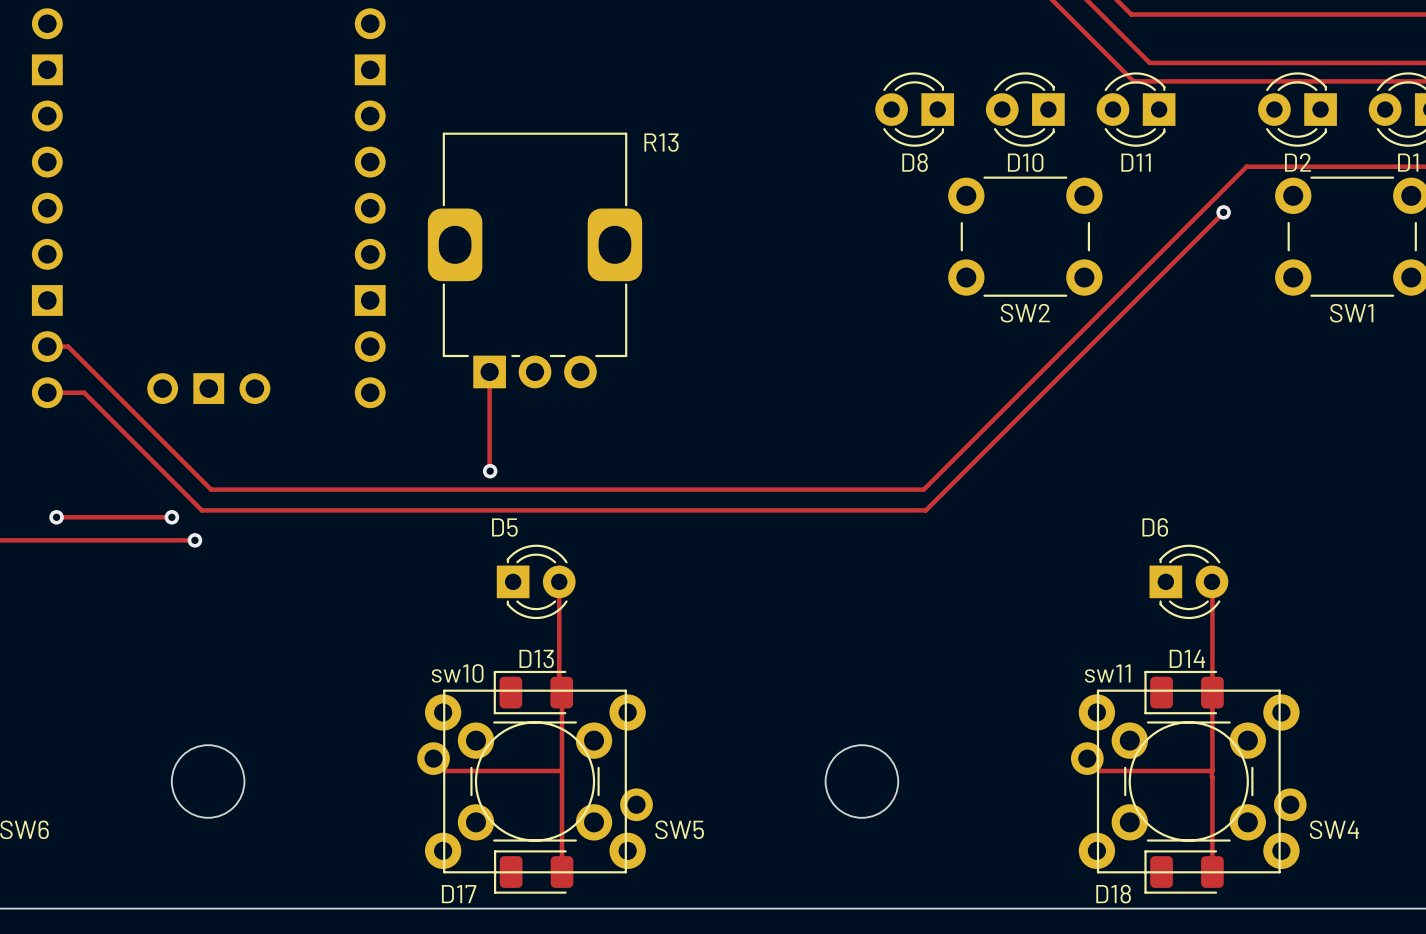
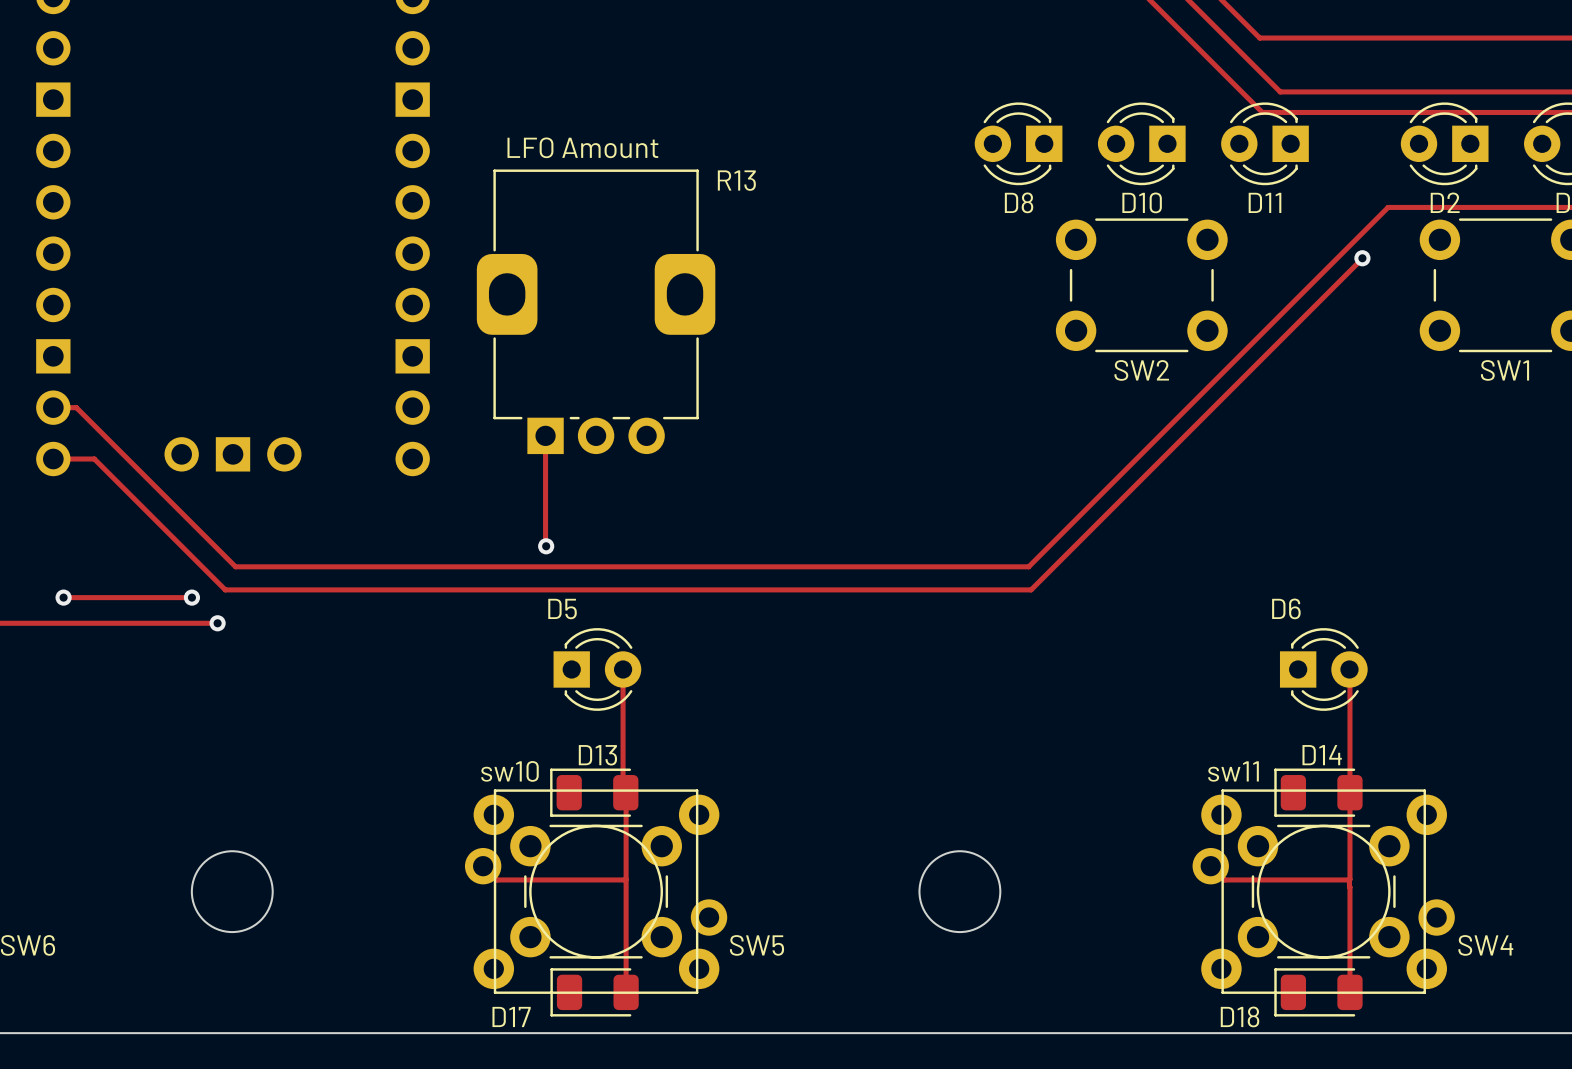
text: none -> LFO Amount (582, 147)

